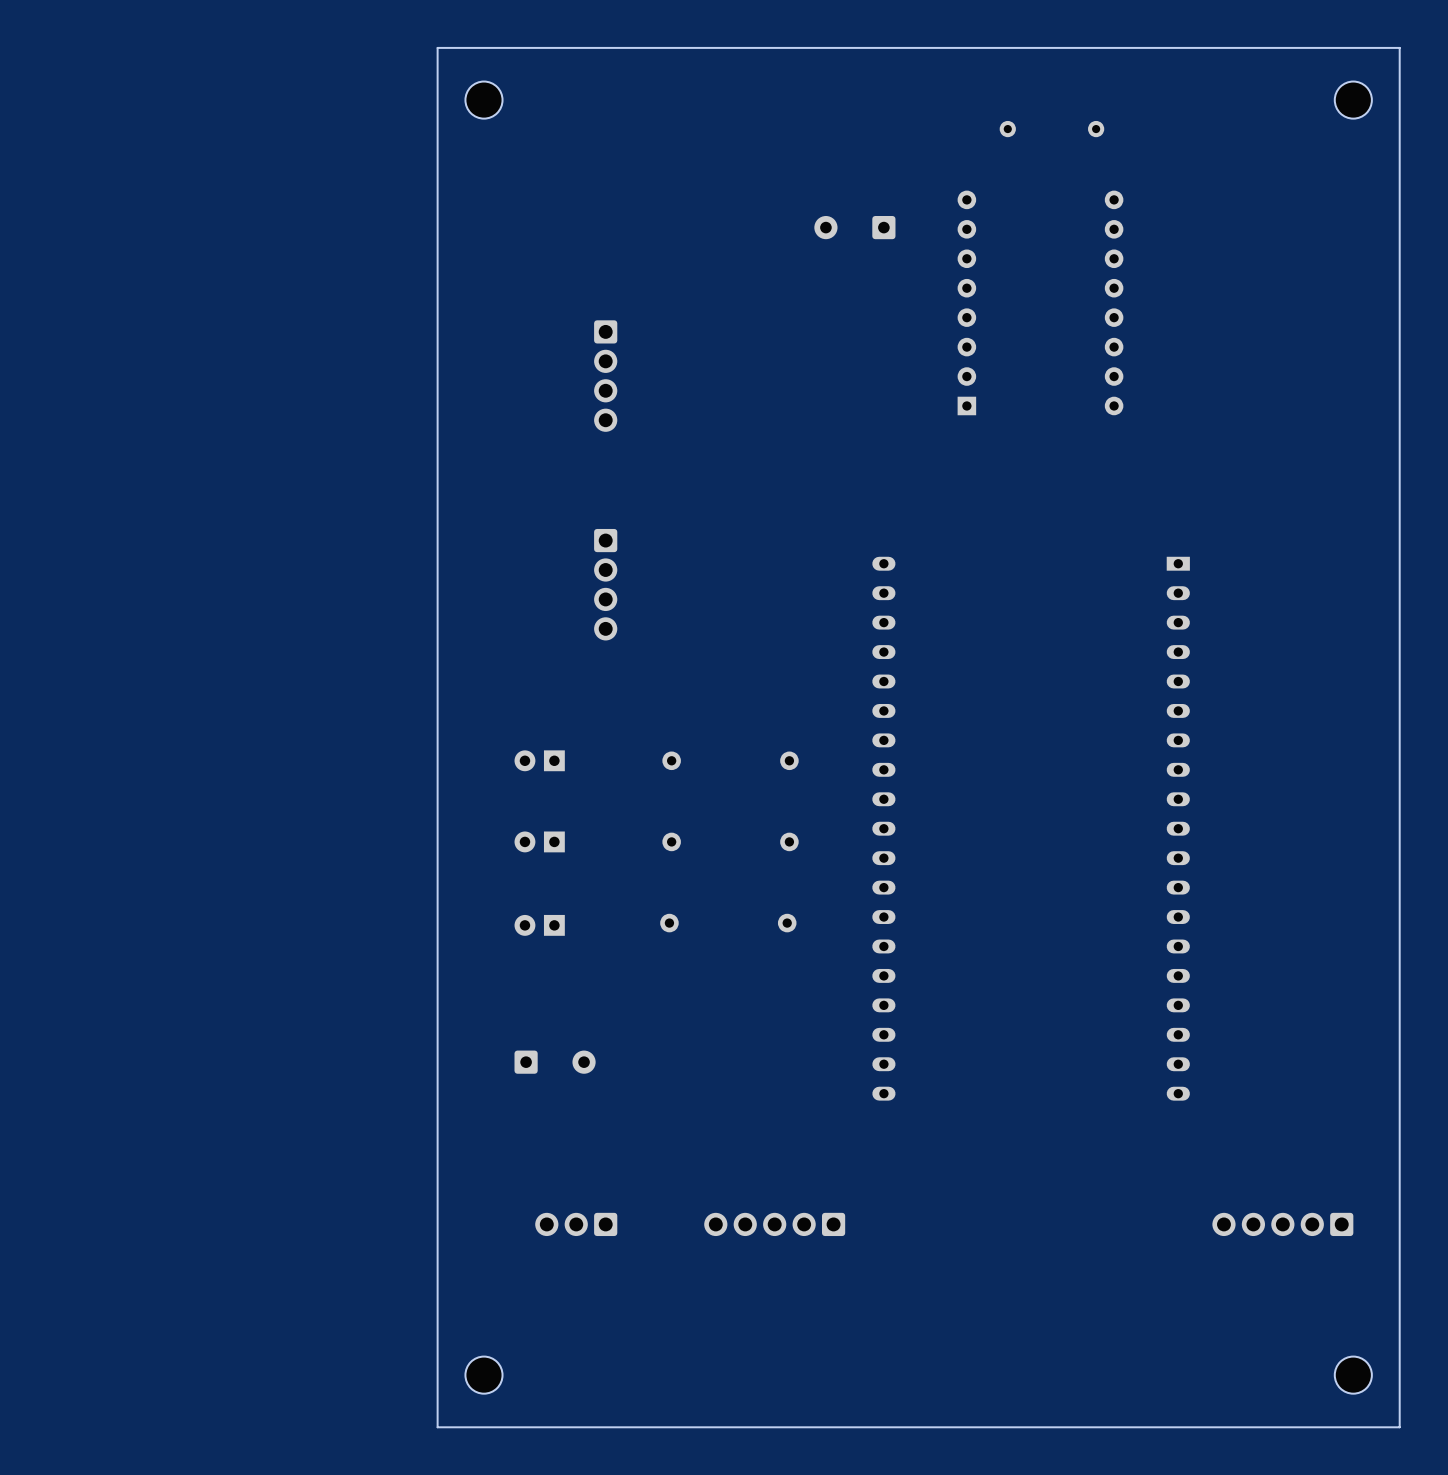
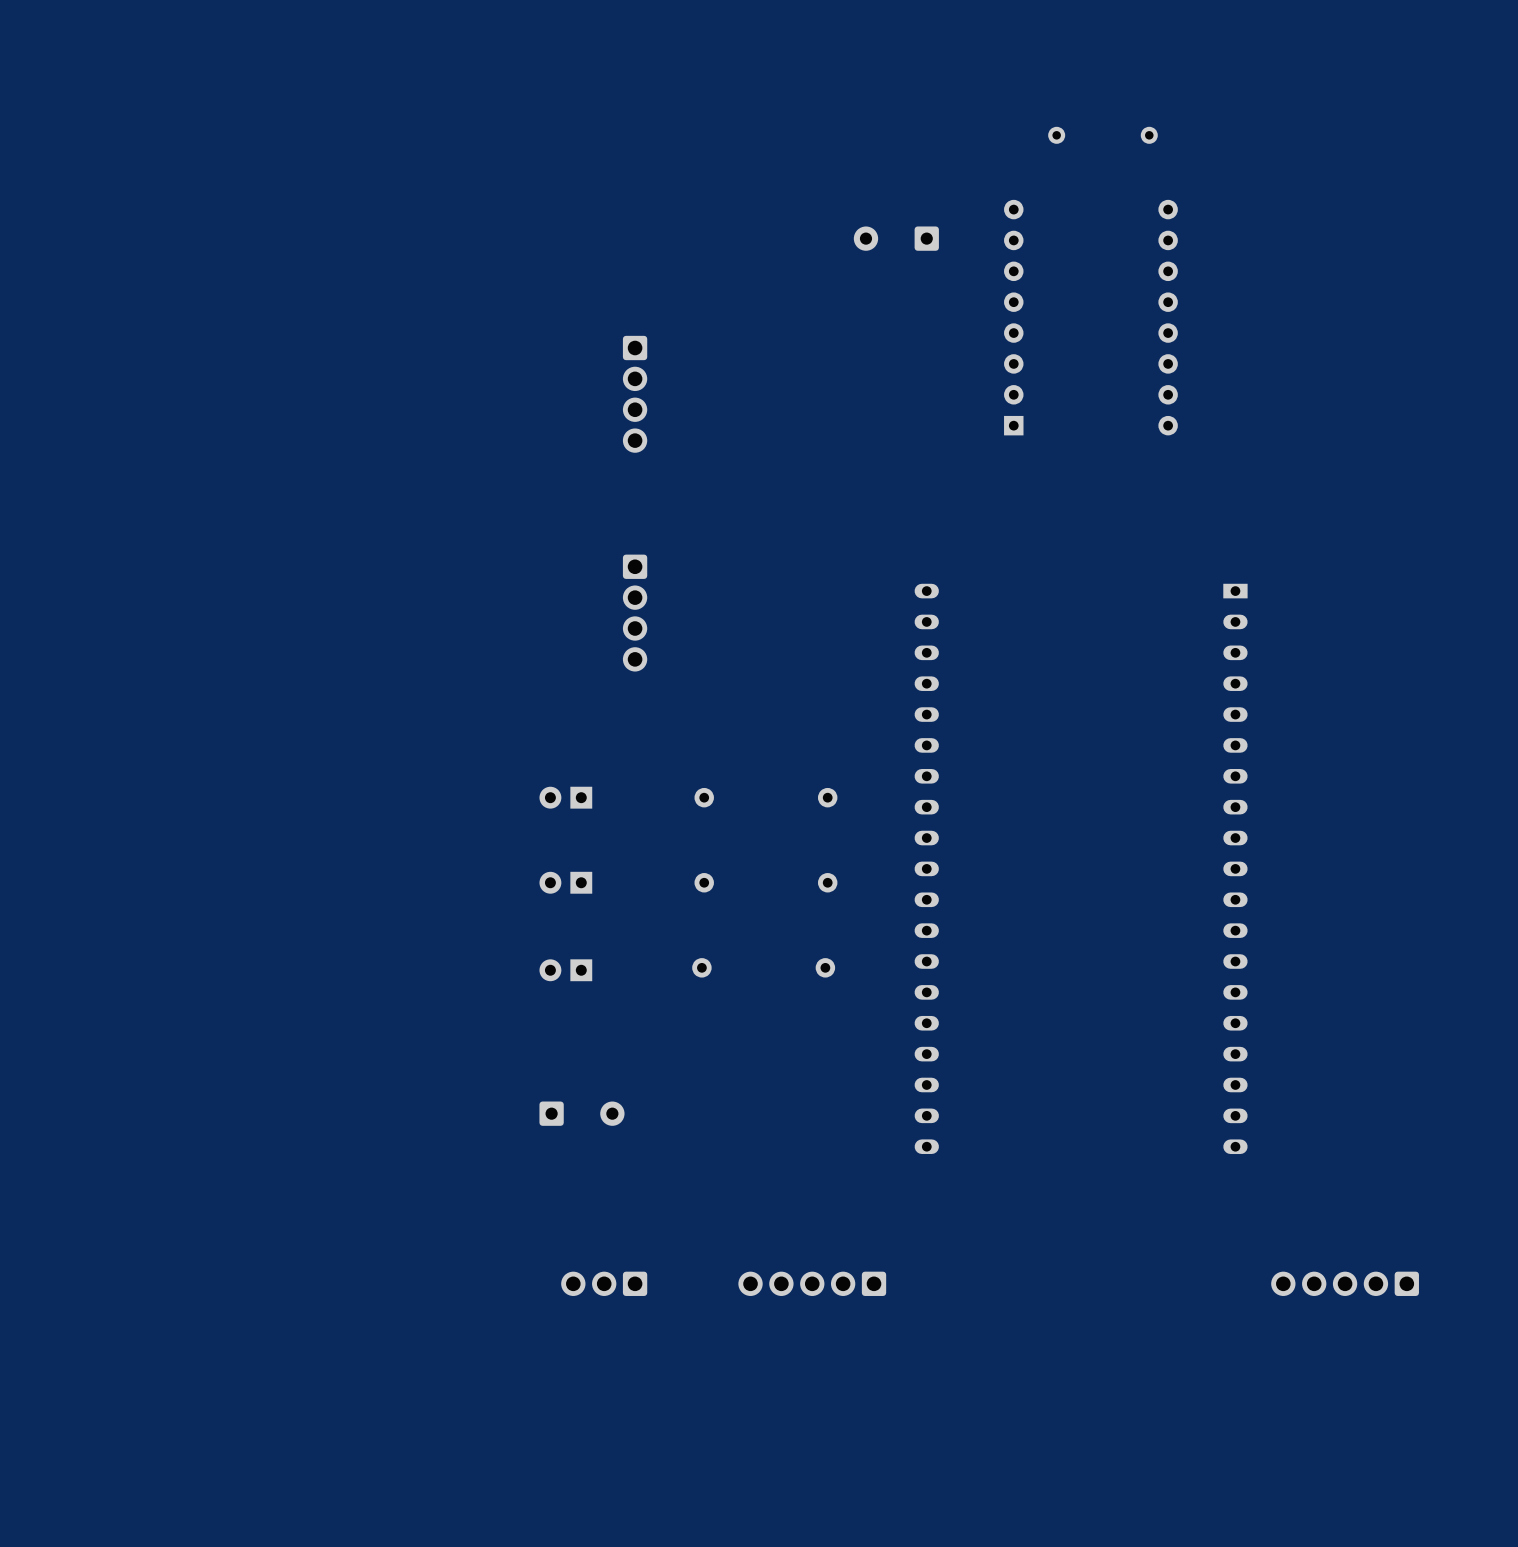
board edge: (1399, 47) (437, 47) (437, 1427) (1399, 1427) (1399, 47) -> none
part: (483, 100) -> none
part: (1353, 100) -> none
part: (483, 1375) -> none
part: (1353, 1375) -> none

